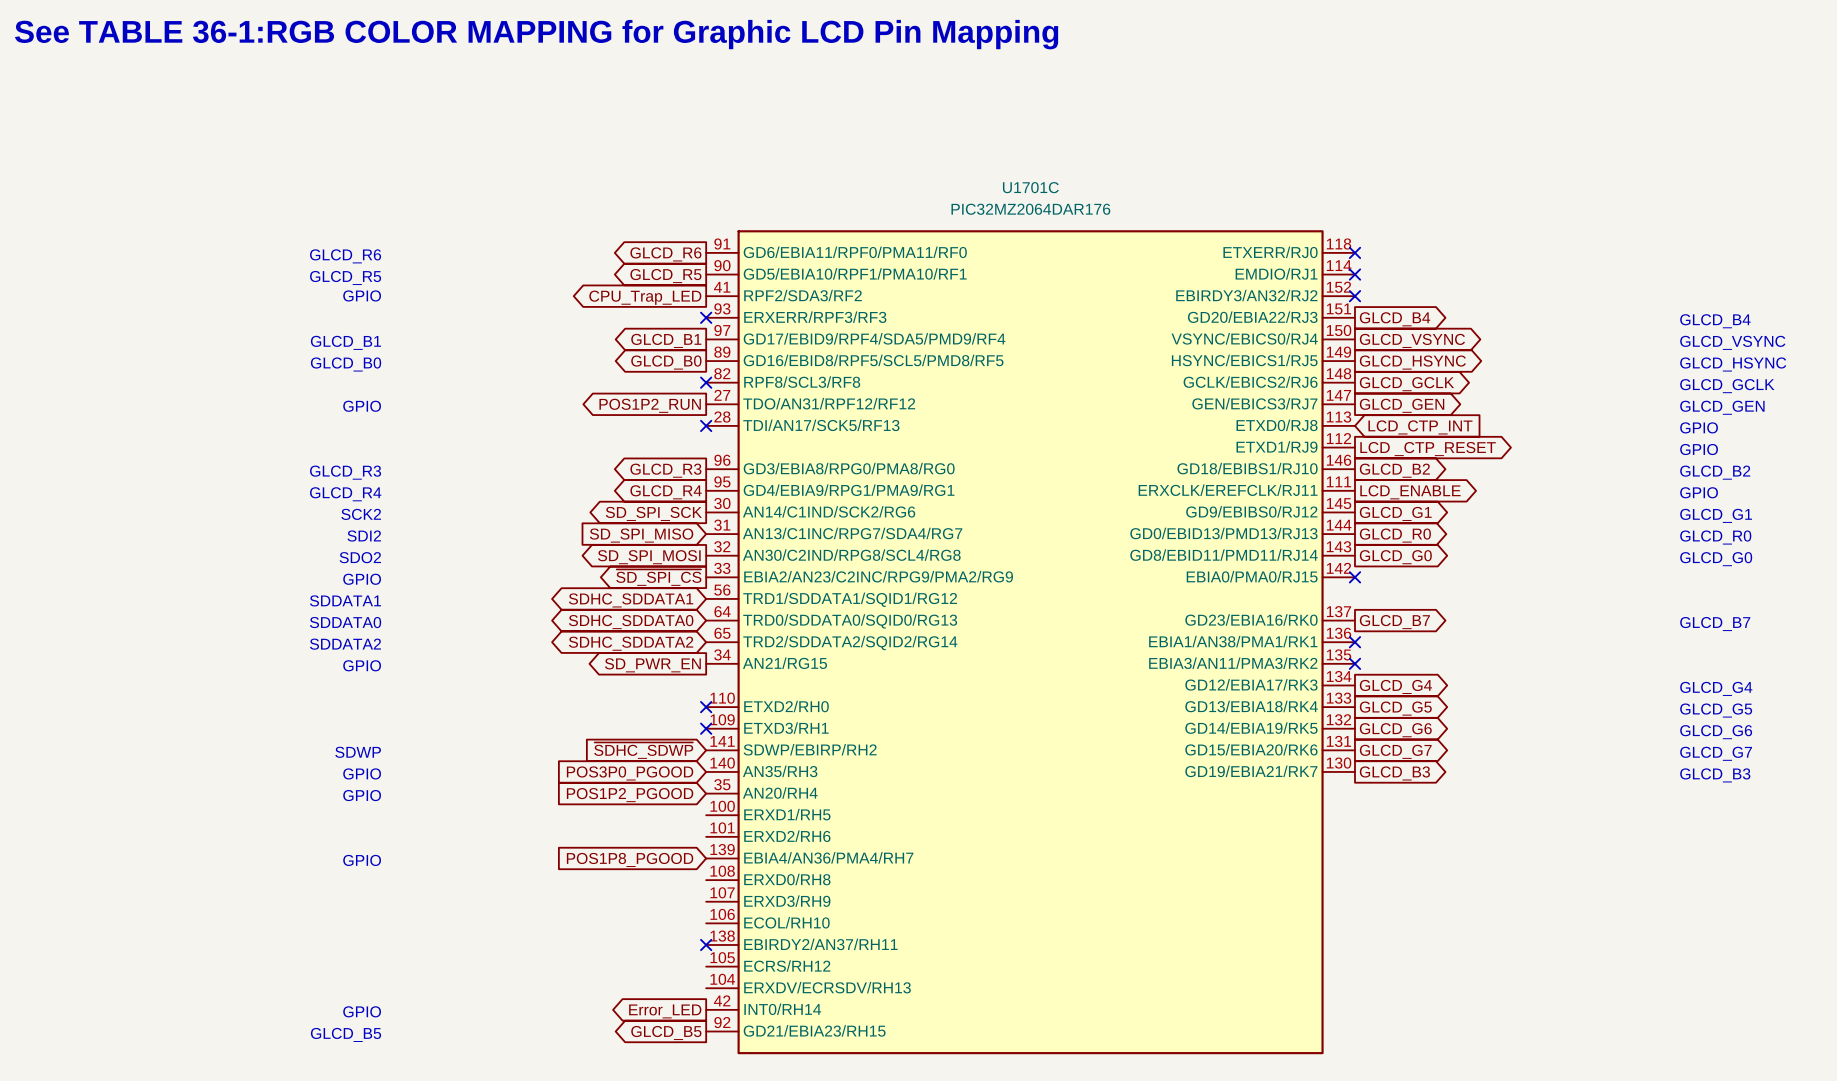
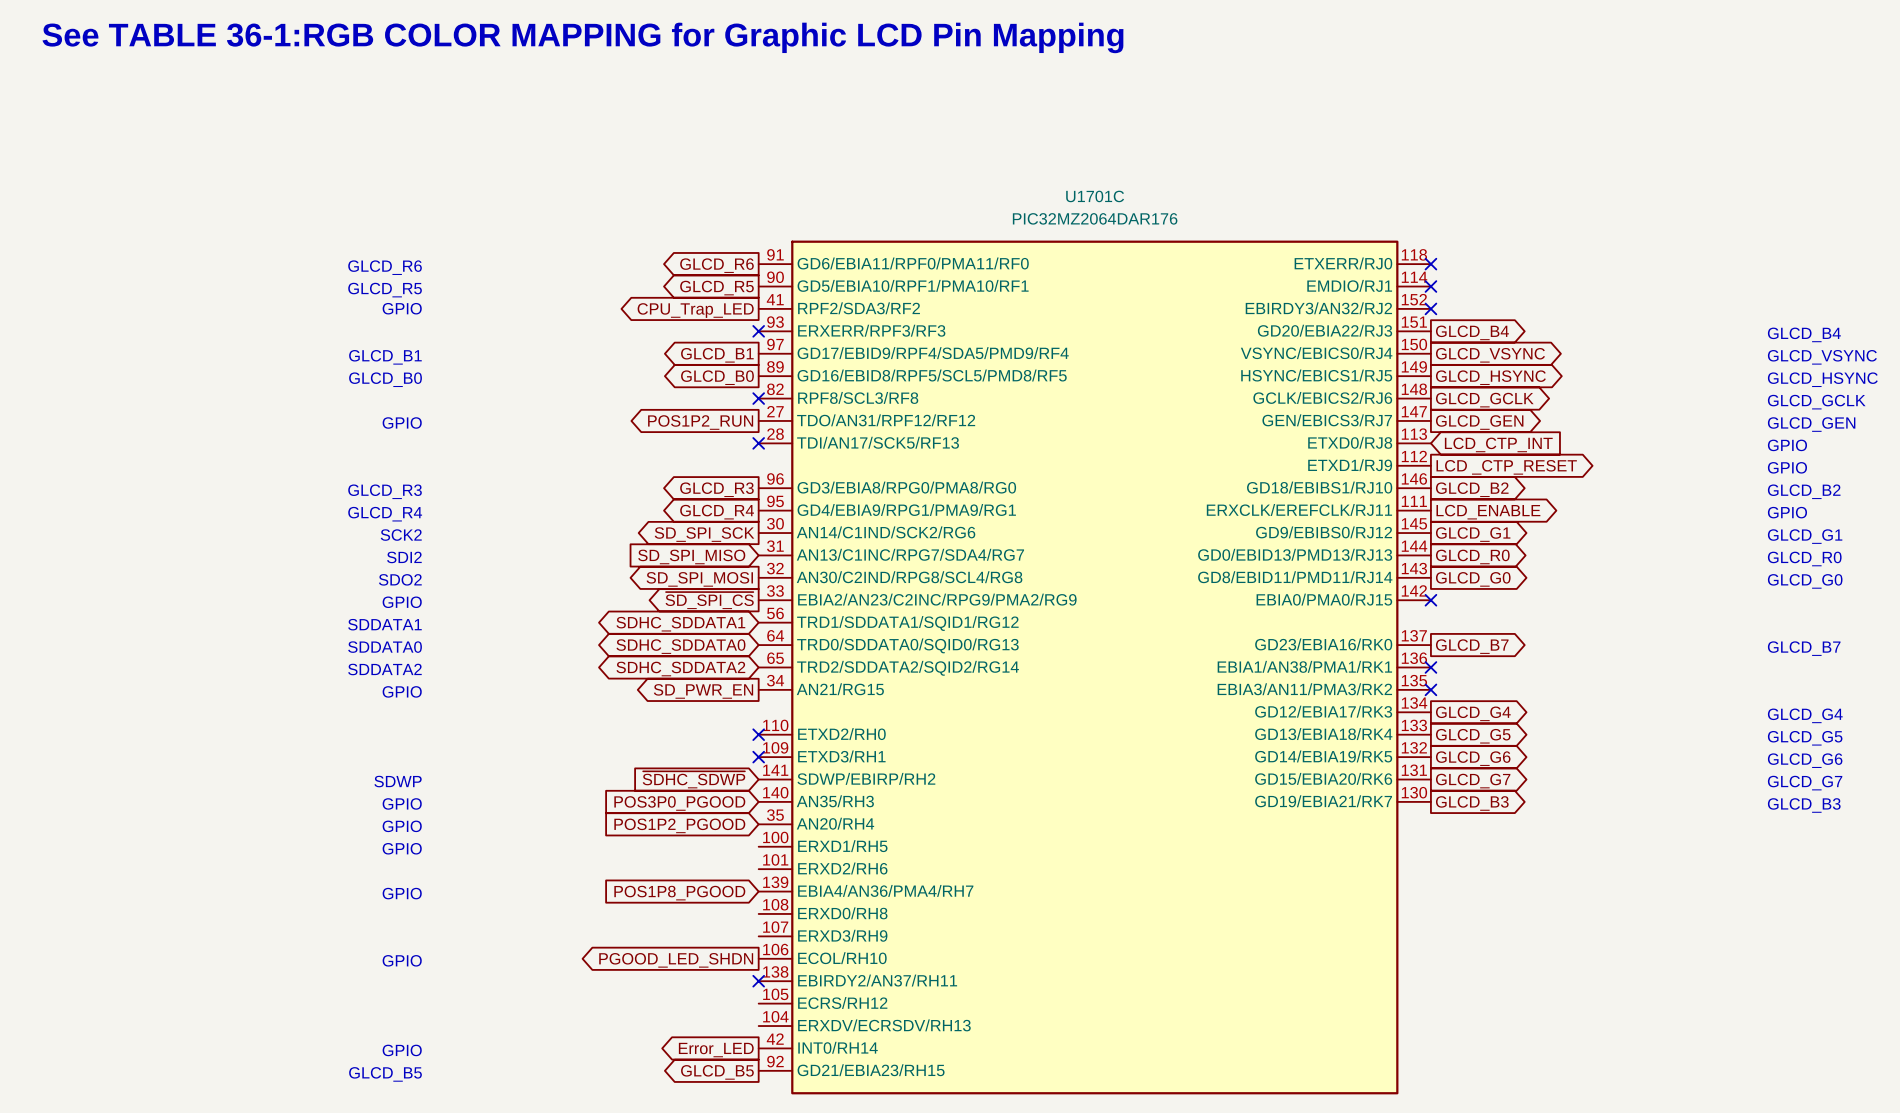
text: none -> GPIO (402, 848)
global label: none -> PGOOD_LED_SHDN (676, 960)
text: none -> GPIO (402, 960)

